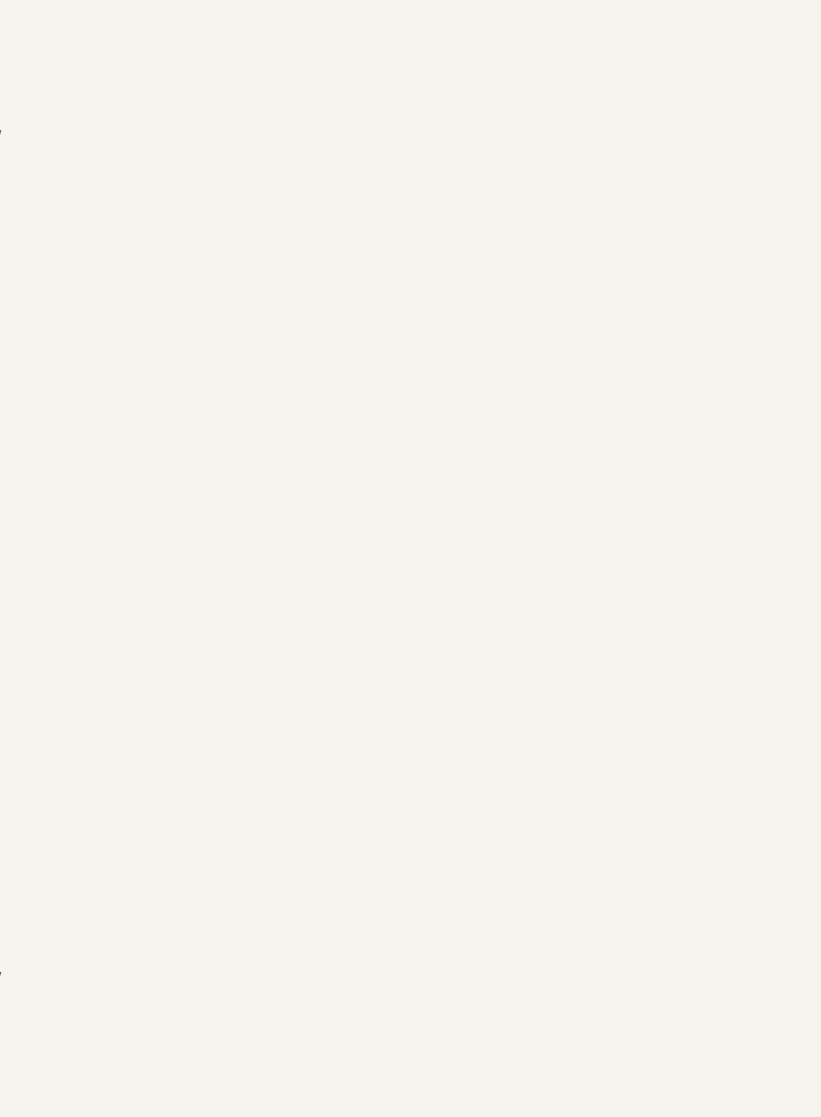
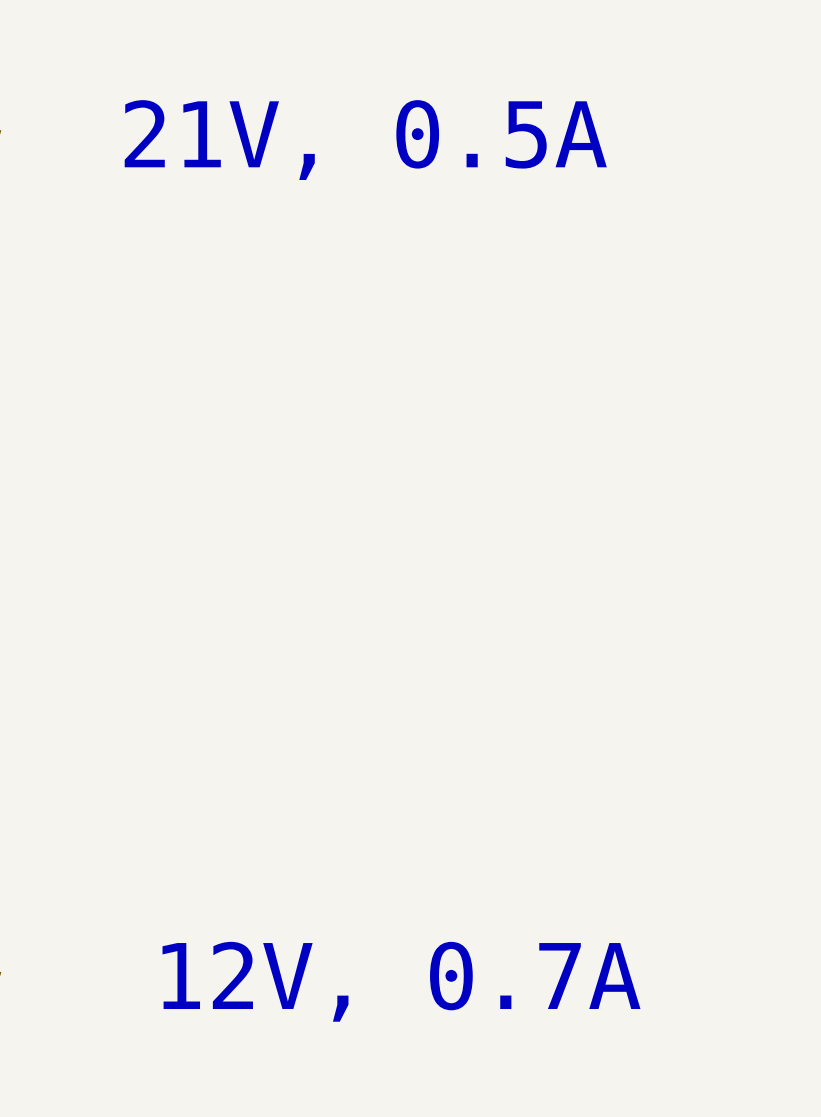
text: none -> 21V, 0.5A (365, 140)
text: none -> 12V, 0.7A (401, 981)

